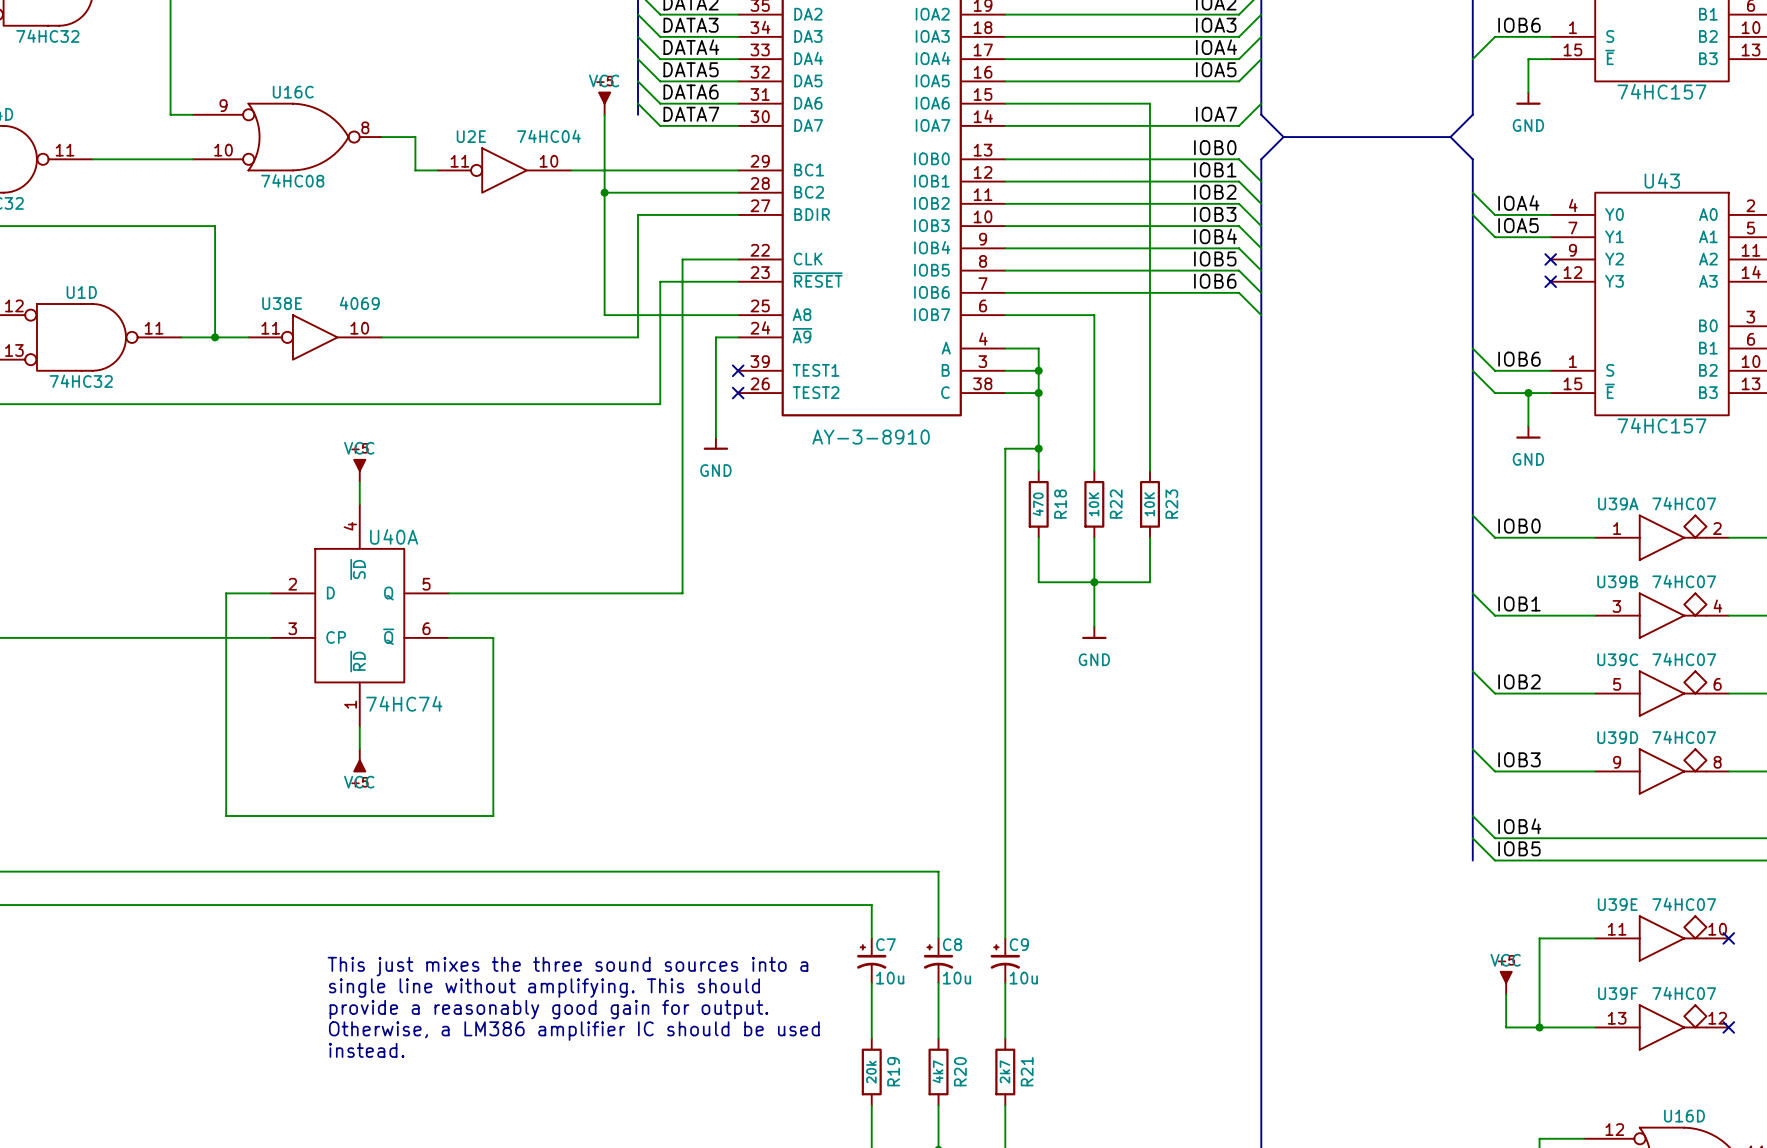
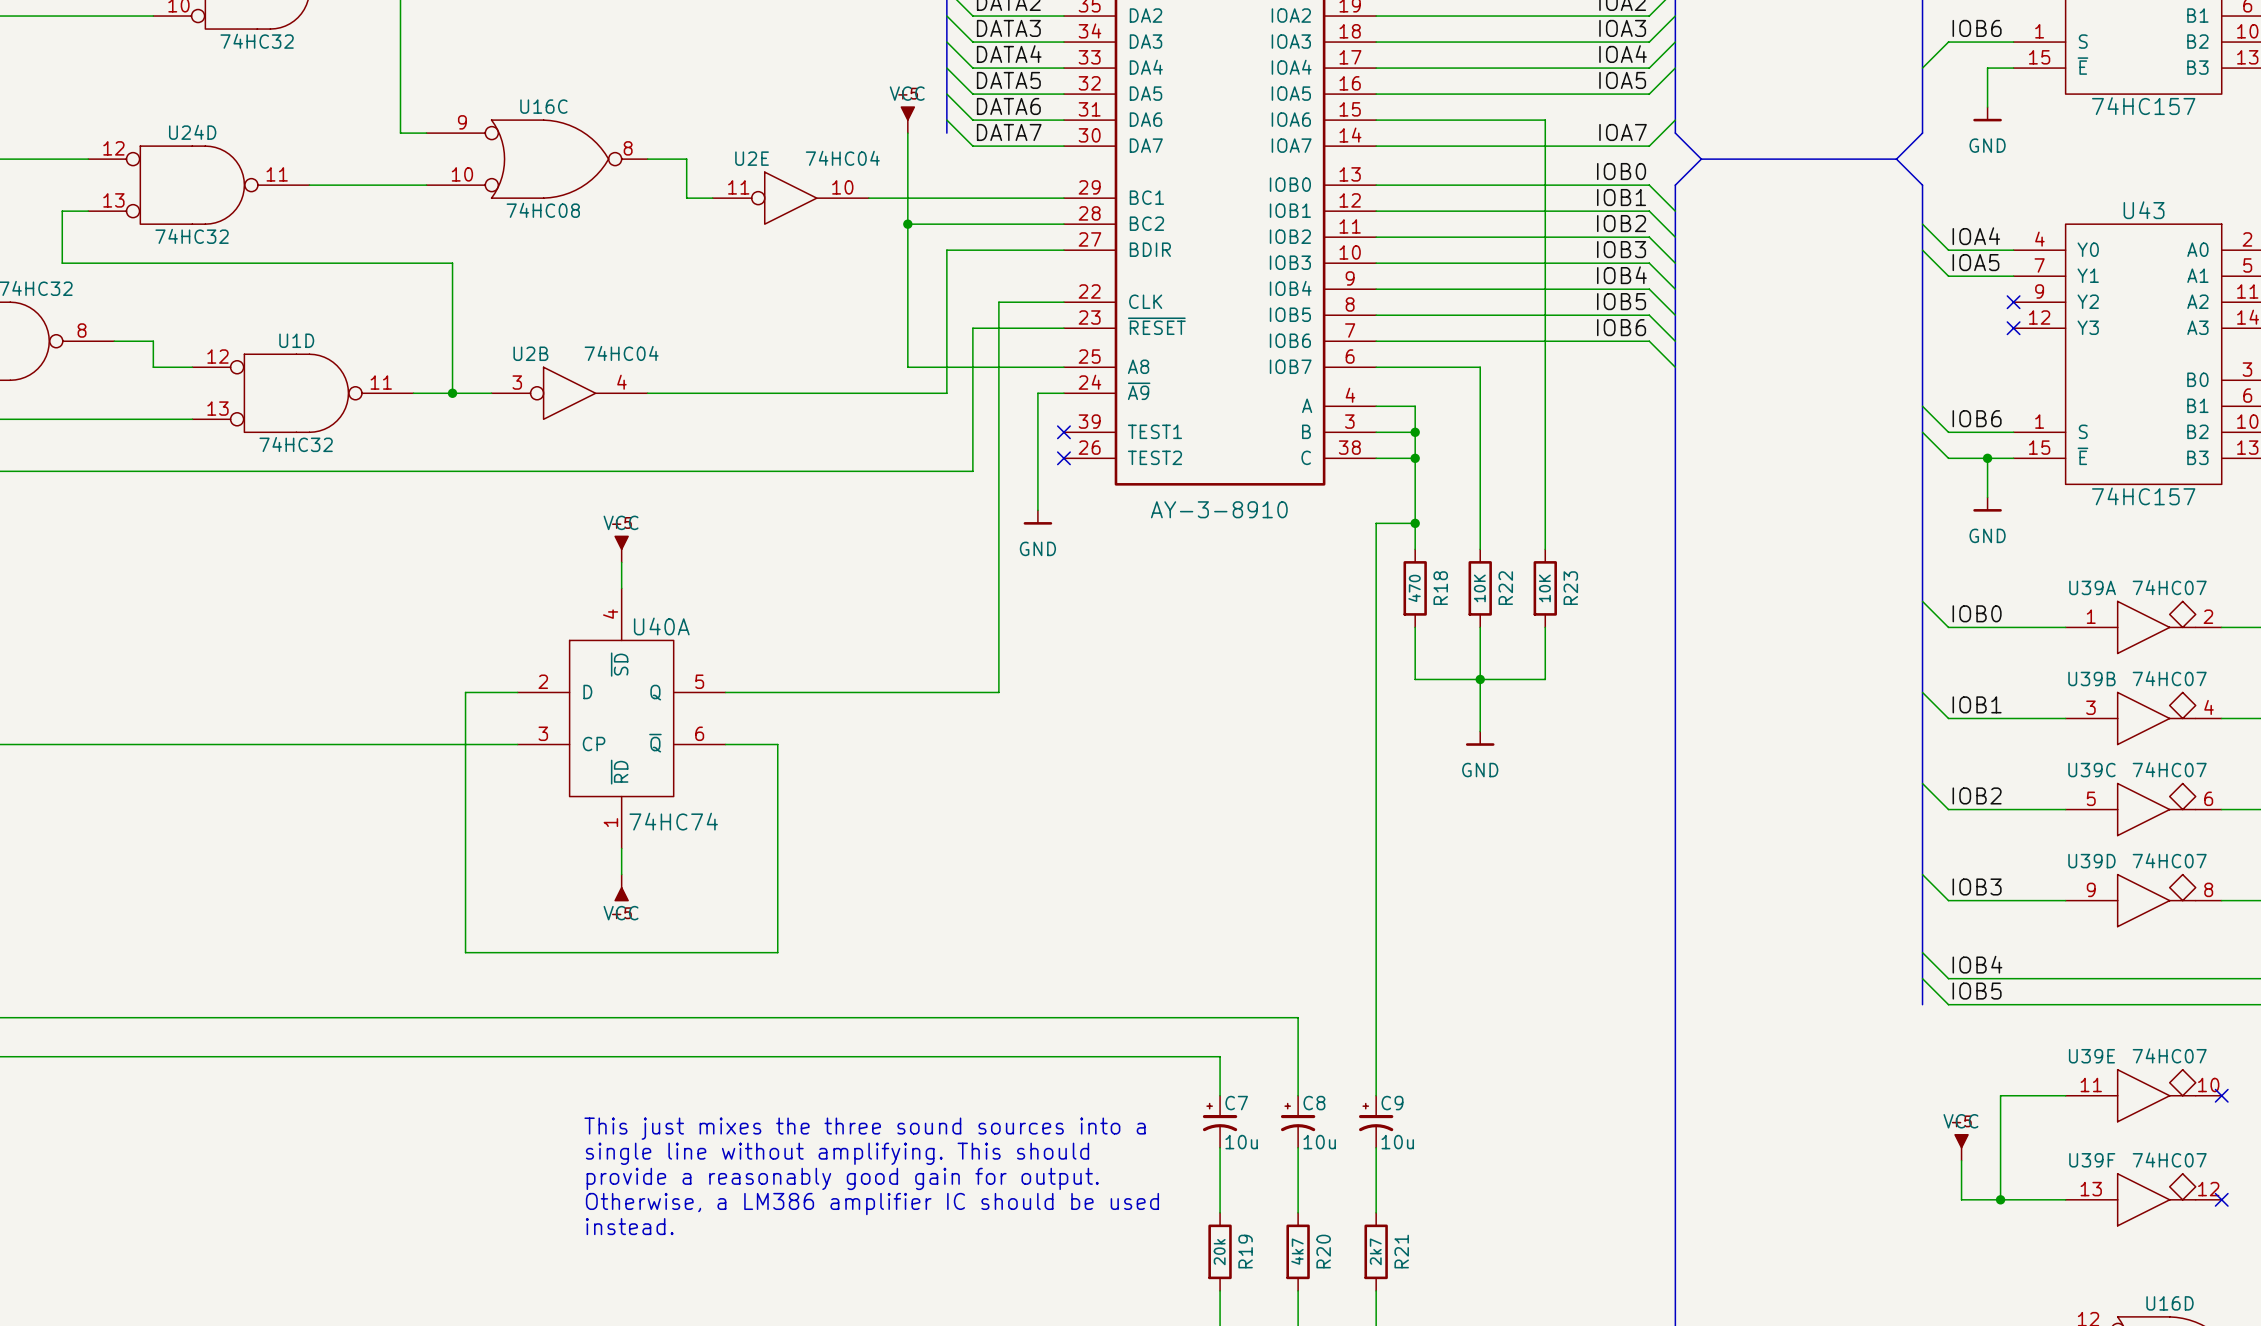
U38E name: U38E (282, 303) -> U2B (530, 353)
U38E value: 4069 (359, 303) -> 74HC04 (621, 353)
U38E pin number: 11 (270, 328) -> 3 (517, 382)
U38E pin number: 10 (359, 328) -> 4 (621, 382)

